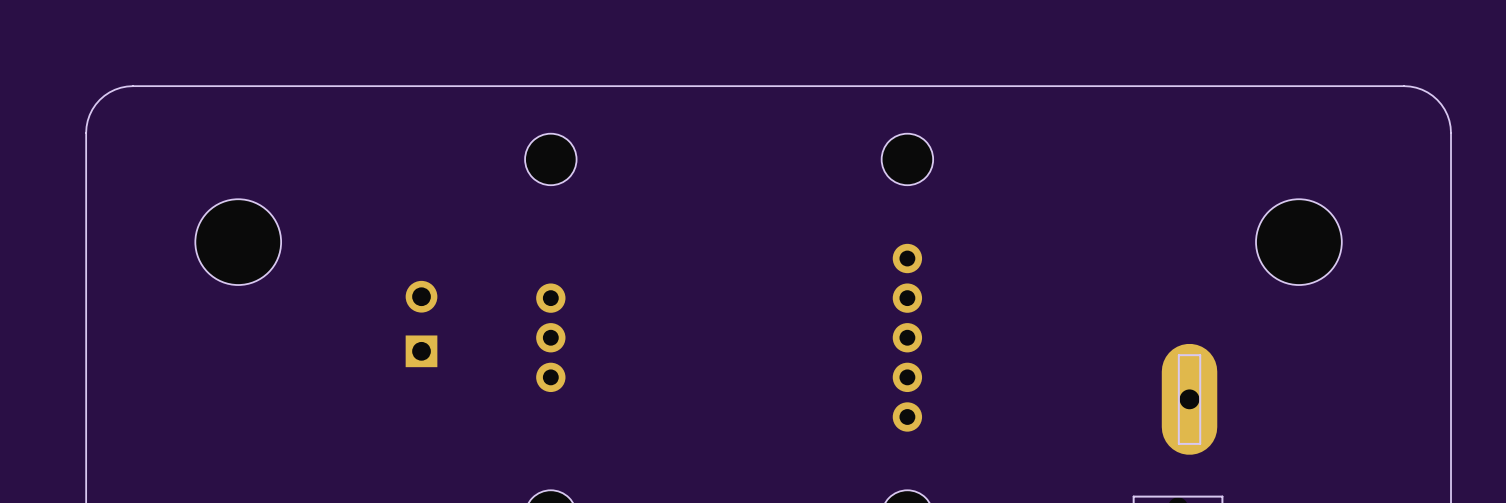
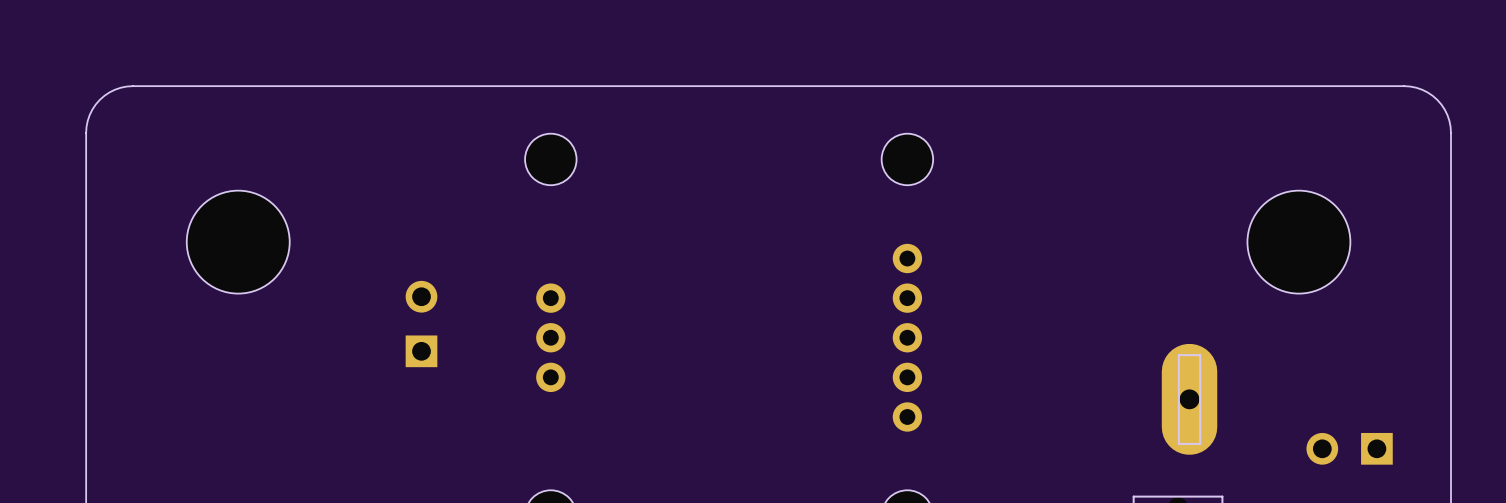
hole size: [195, 199, 282, 286] -> [186, 190, 290, 294]
hole size: [1256, 199, 1342, 286] -> [1247, 190, 1351, 294]
part: none -> (1349, 448)

